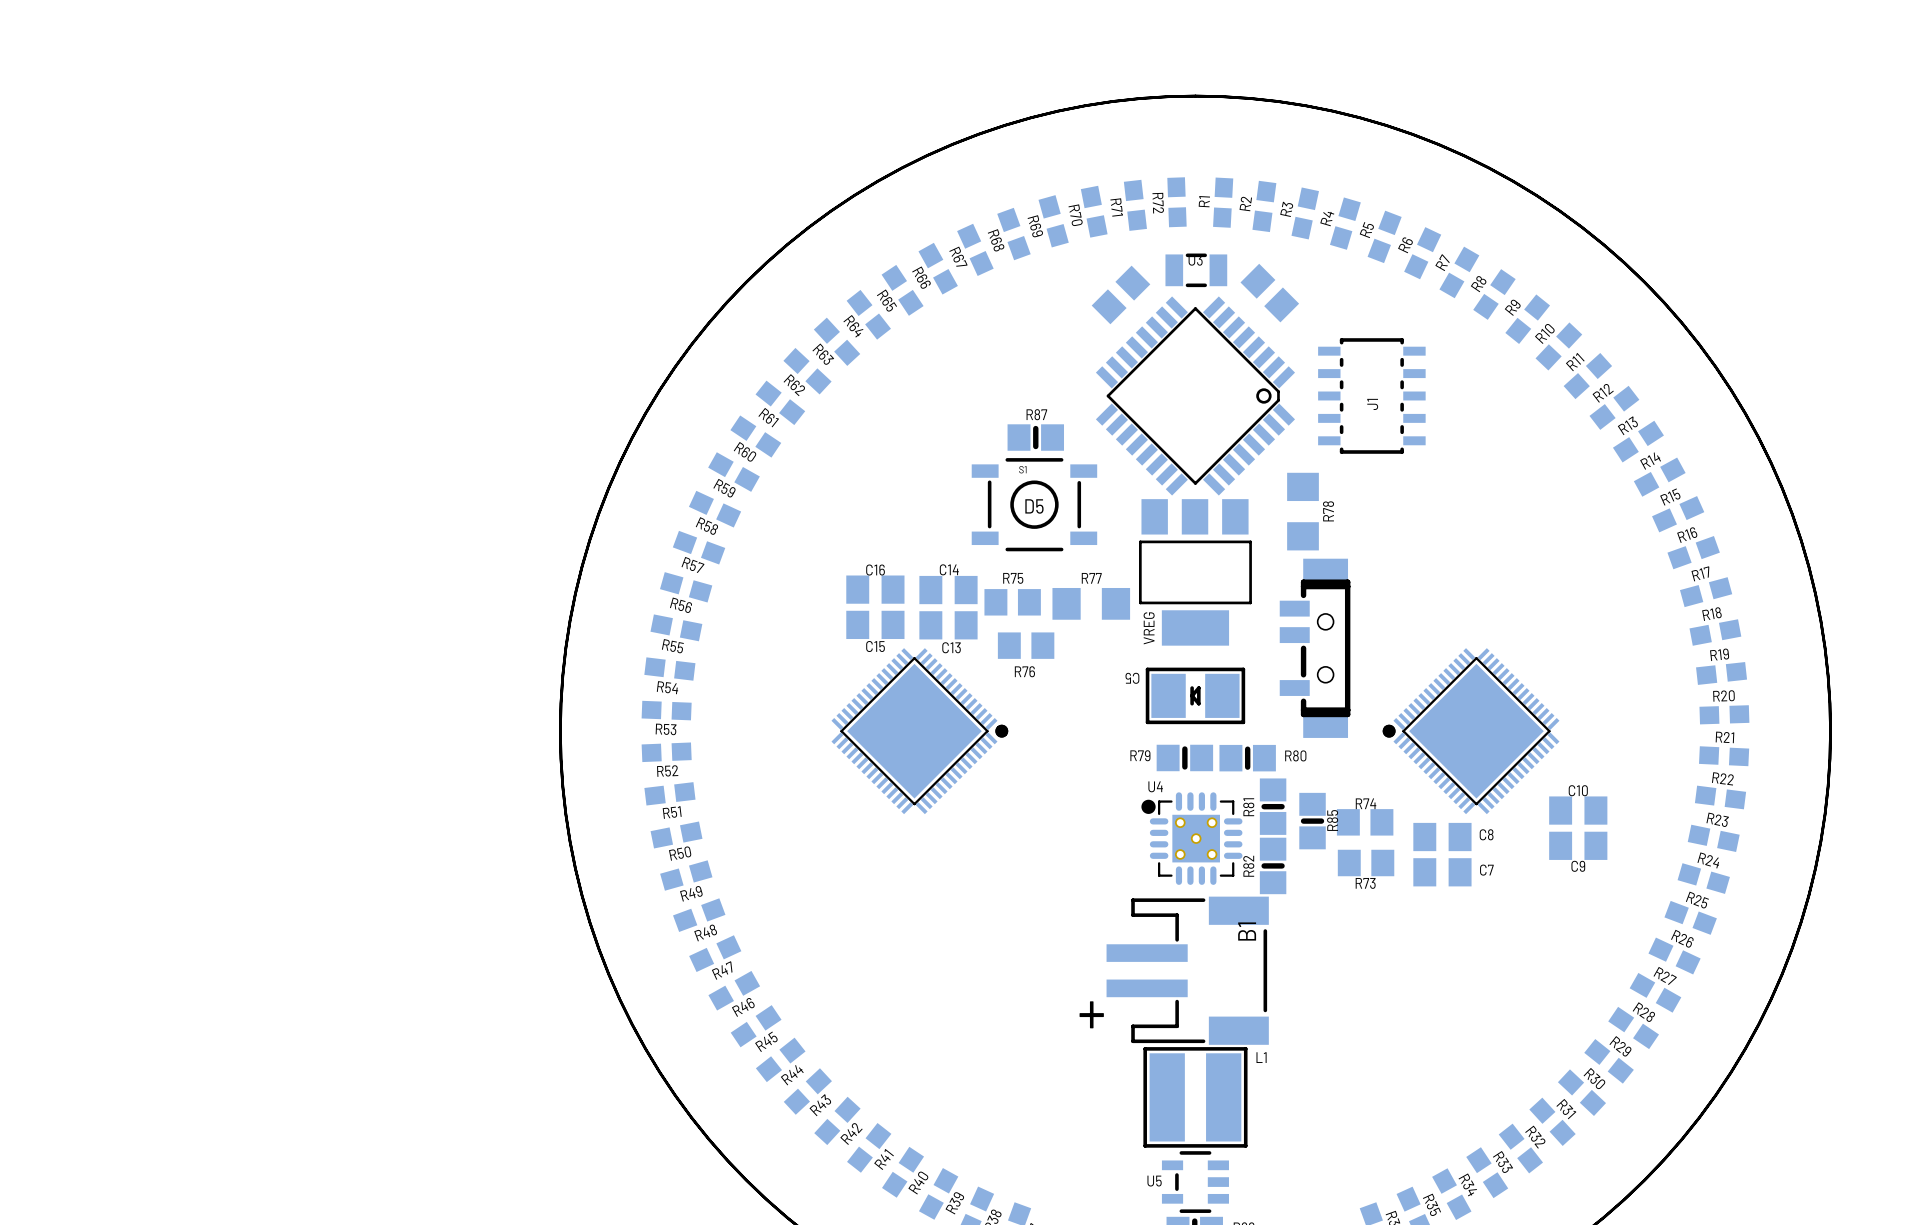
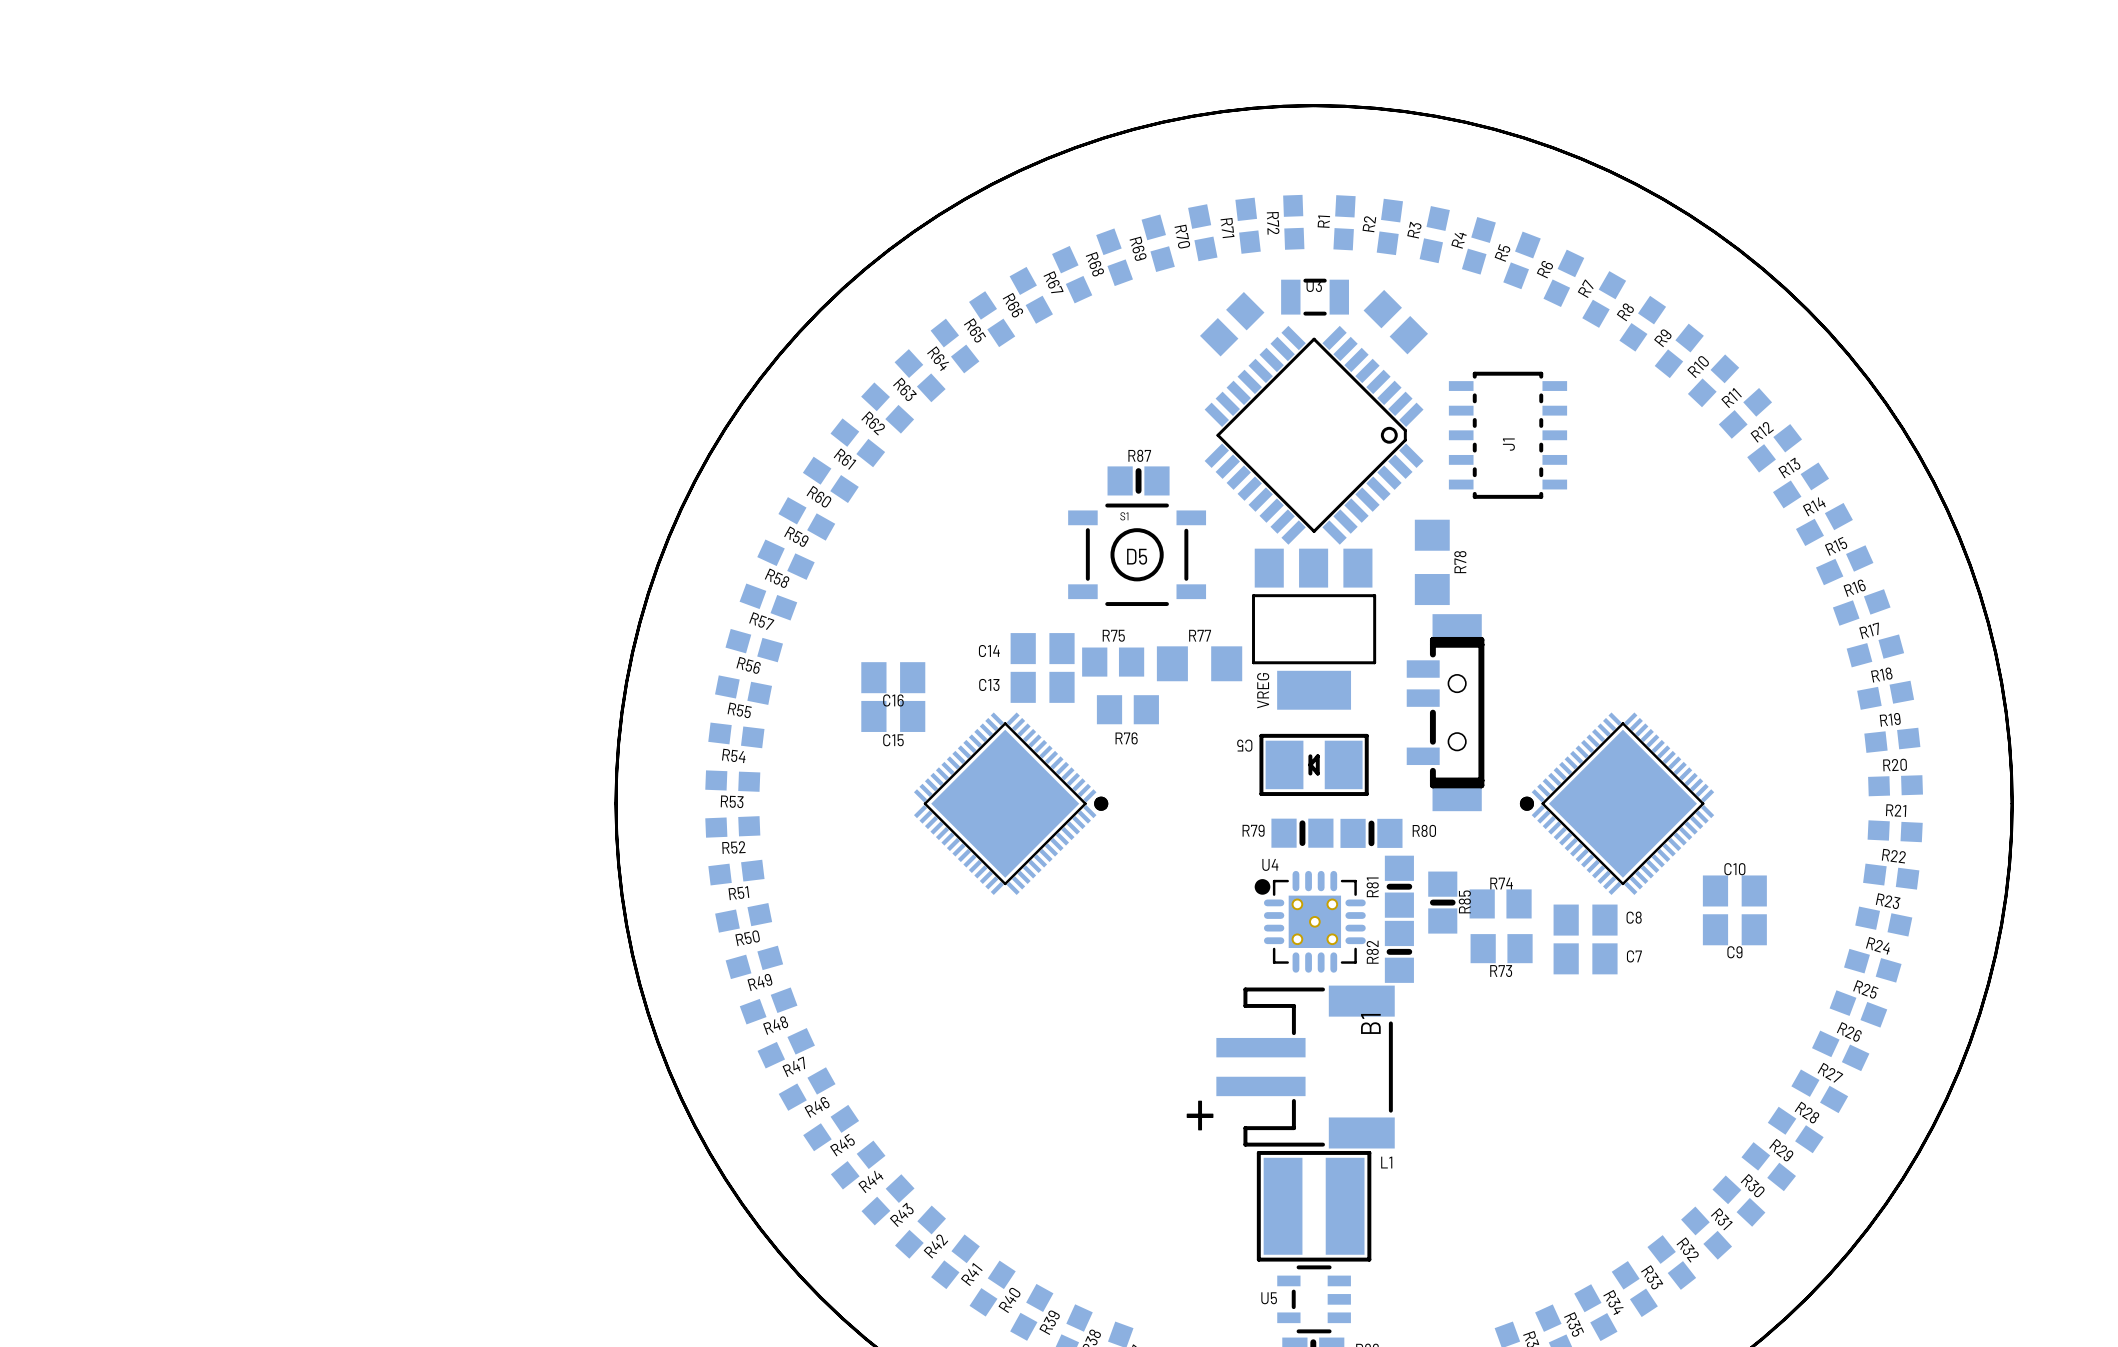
C14 name position: C14 (949, 569) -> C14 (989, 651)
C16 name position: C16 (875, 570) -> C16 (893, 700)
C16 position: (875, 589) -> (893, 677)
C15 position: (875, 624) -> (893, 716)
C13 name position: C13 (951, 647) -> C13 (989, 684)

